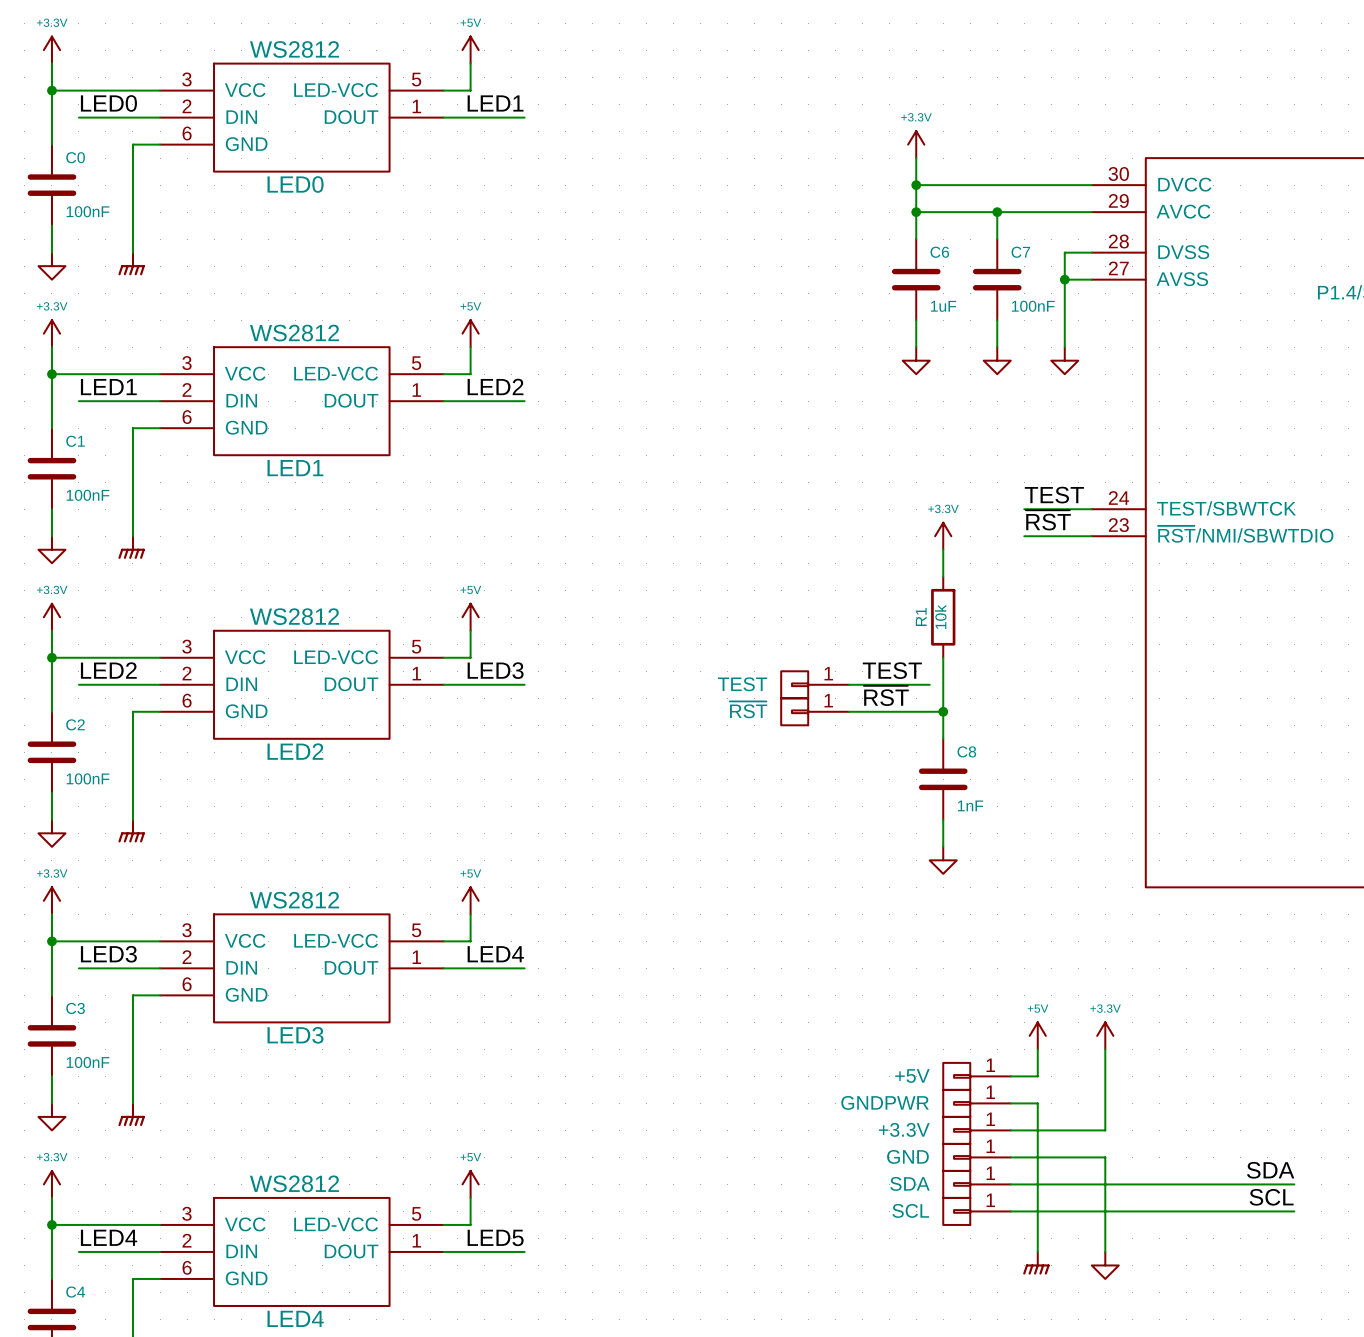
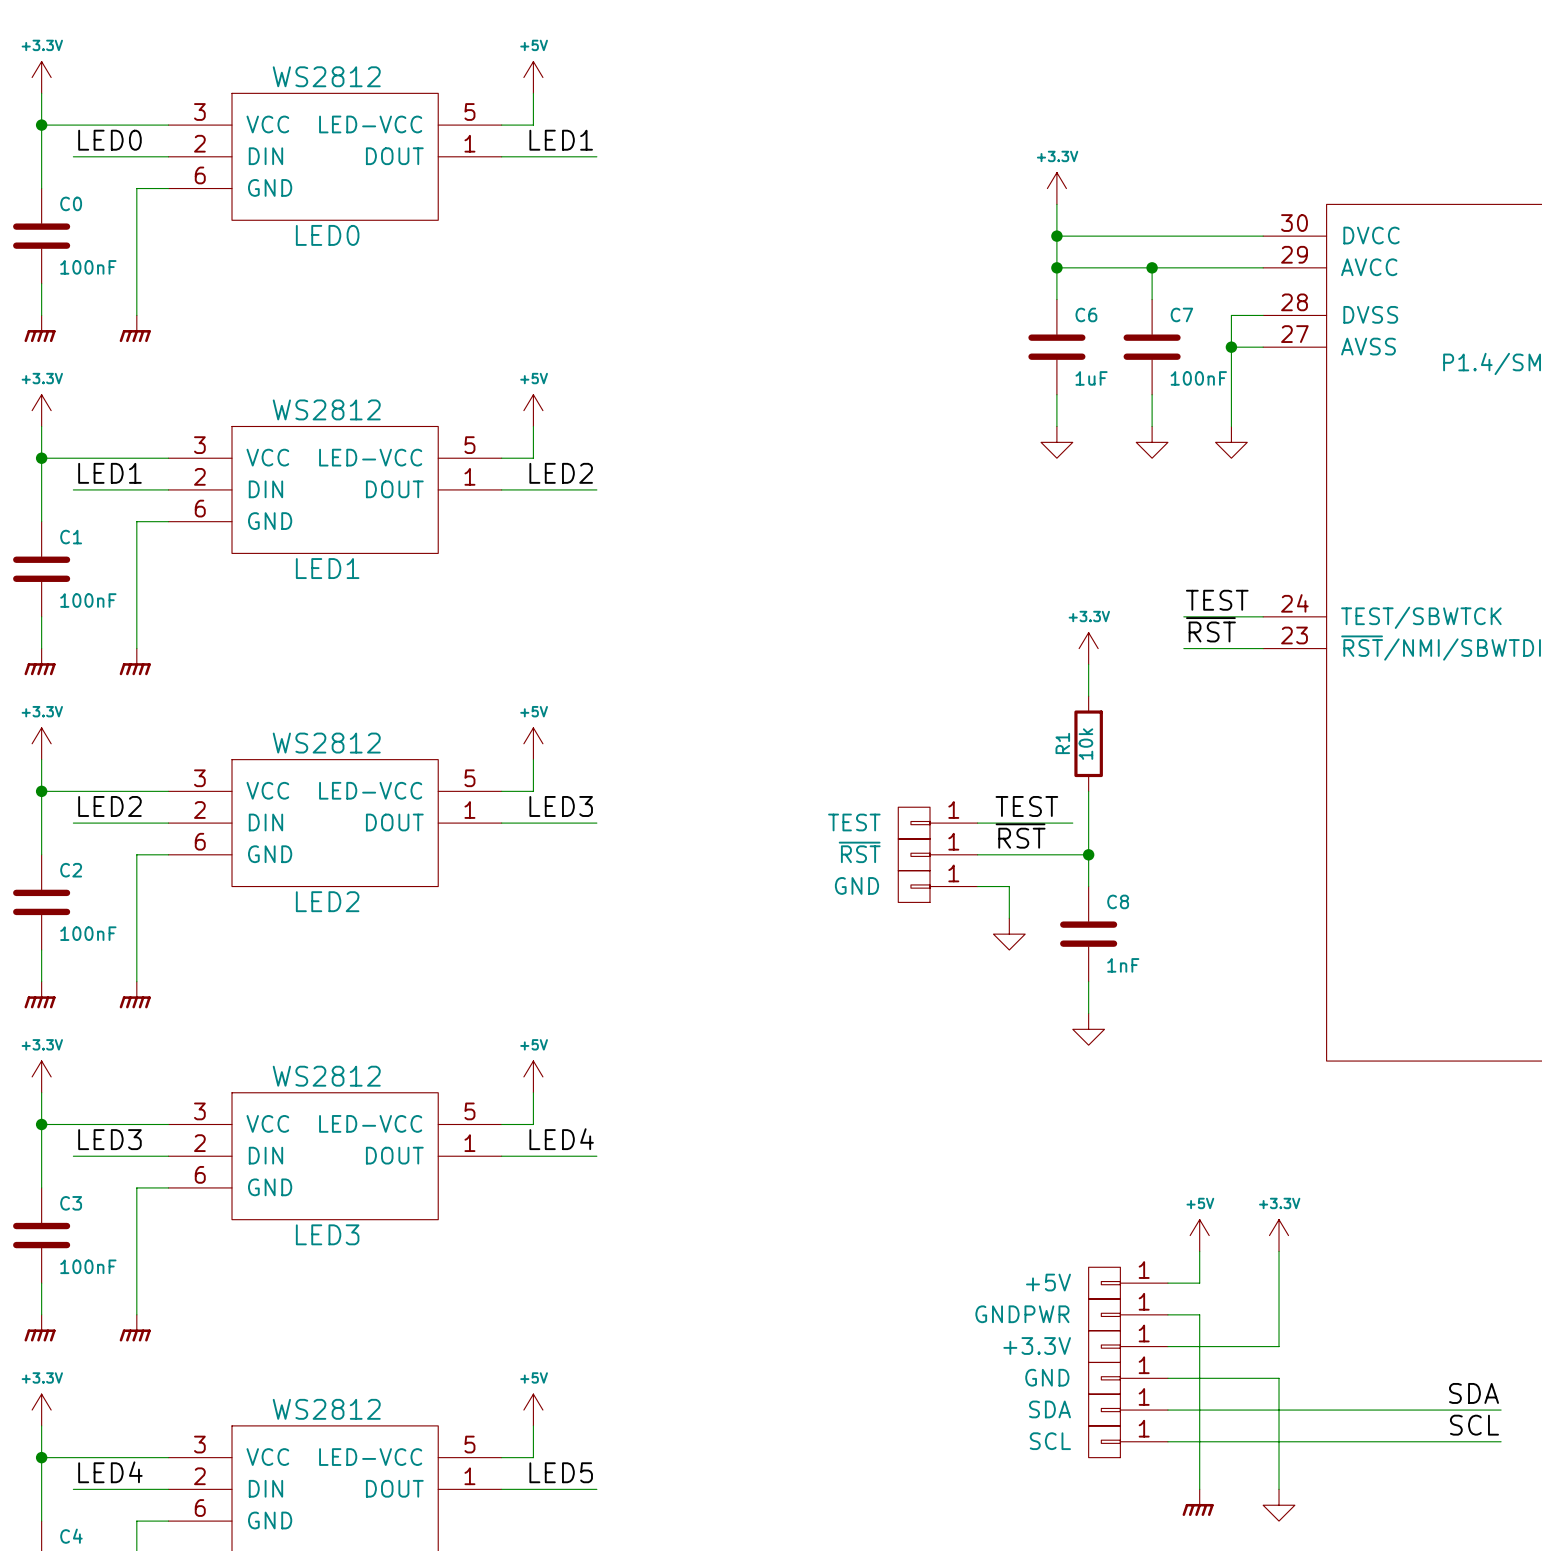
power symbol shape: [38, 252, 66, 280] -> [24, 315, 56, 343]
power symbol shape: [38, 536, 66, 564] -> [24, 648, 56, 676]
part: none -> GND (937, 886)
wire: none -> (977, 886) (1009, 886) (1009, 918)
power symbol: none -> (1009, 934)
power symbol shape: [38, 819, 66, 847] -> [24, 981, 56, 1009]
power symbol shape: [38, 1103, 66, 1131] -> [24, 1314, 56, 1342]

